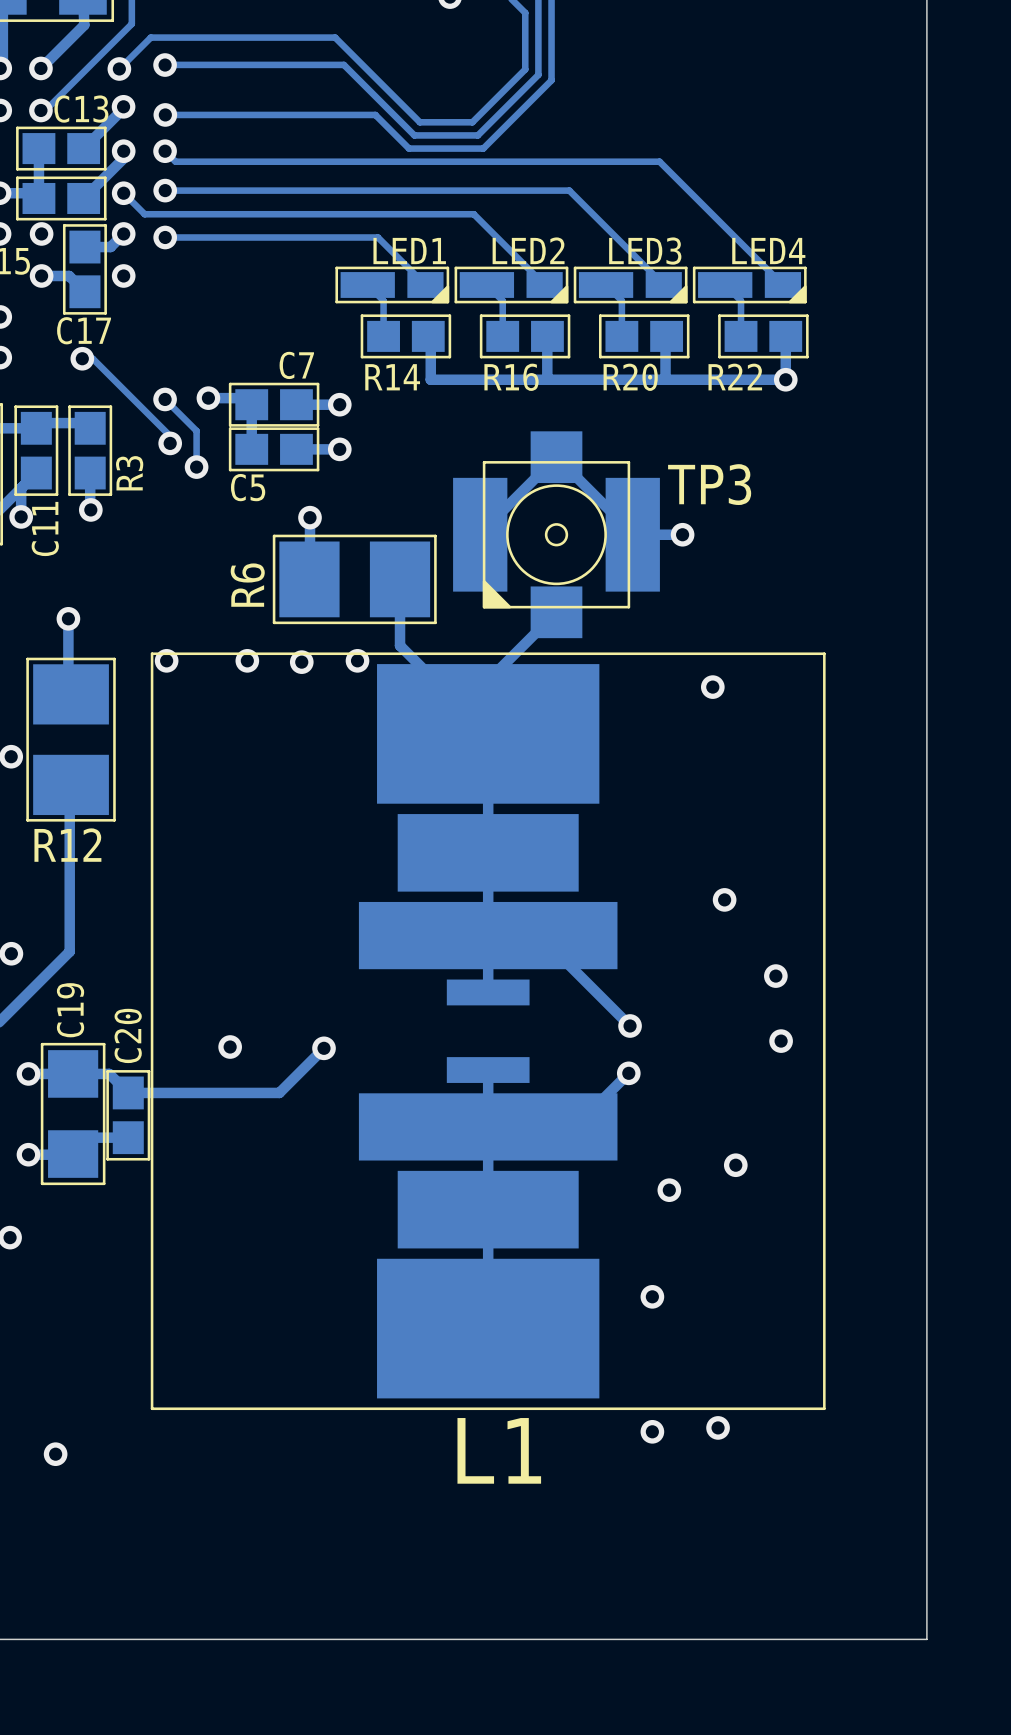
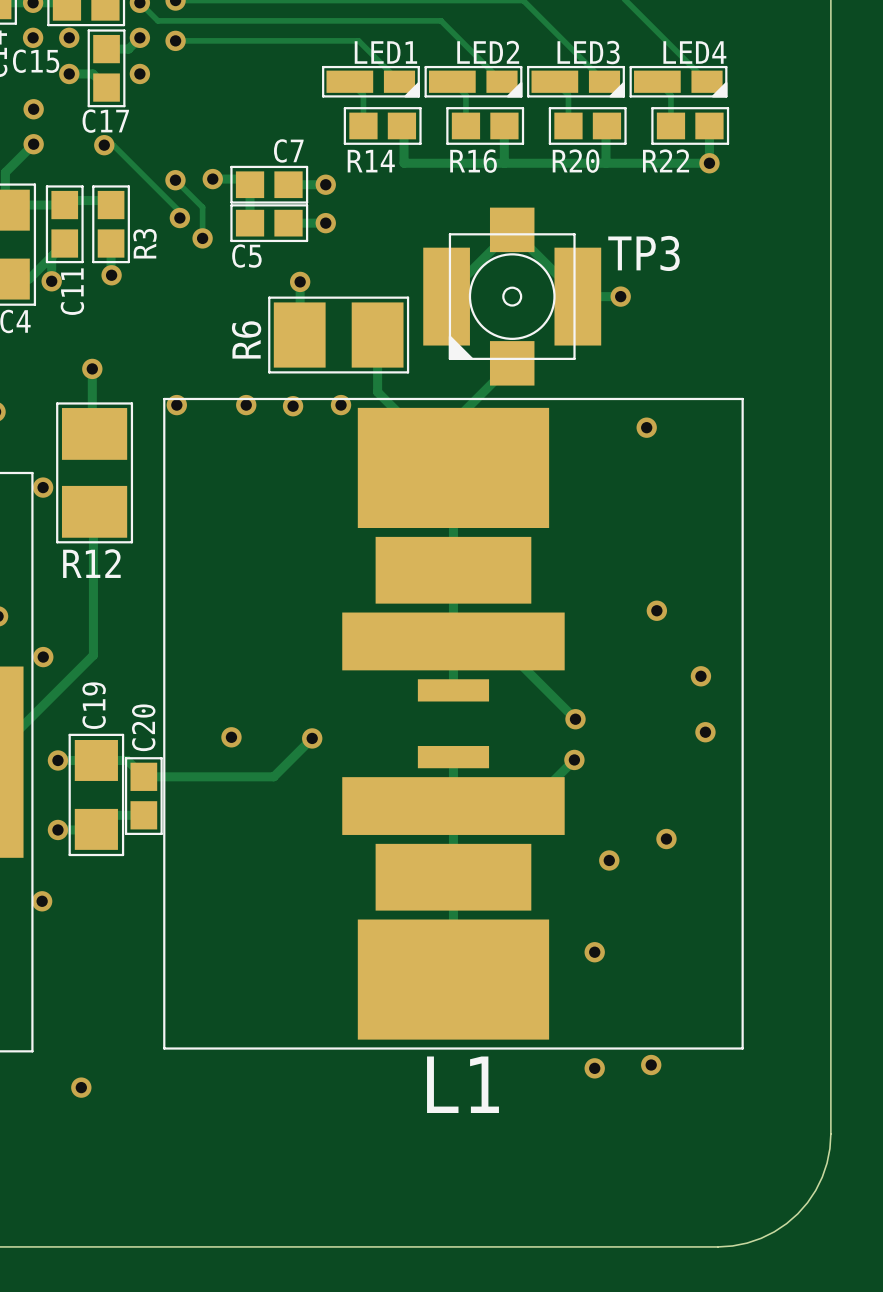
board edge: (926, 1508) (926, 1639) (795, 1639) -> (830, 1133) (827, 1163) (822, 1177) (807, 1202) (797, 1213) (786, 1223) (761, 1238) (747, 1243) (717, 1246)

